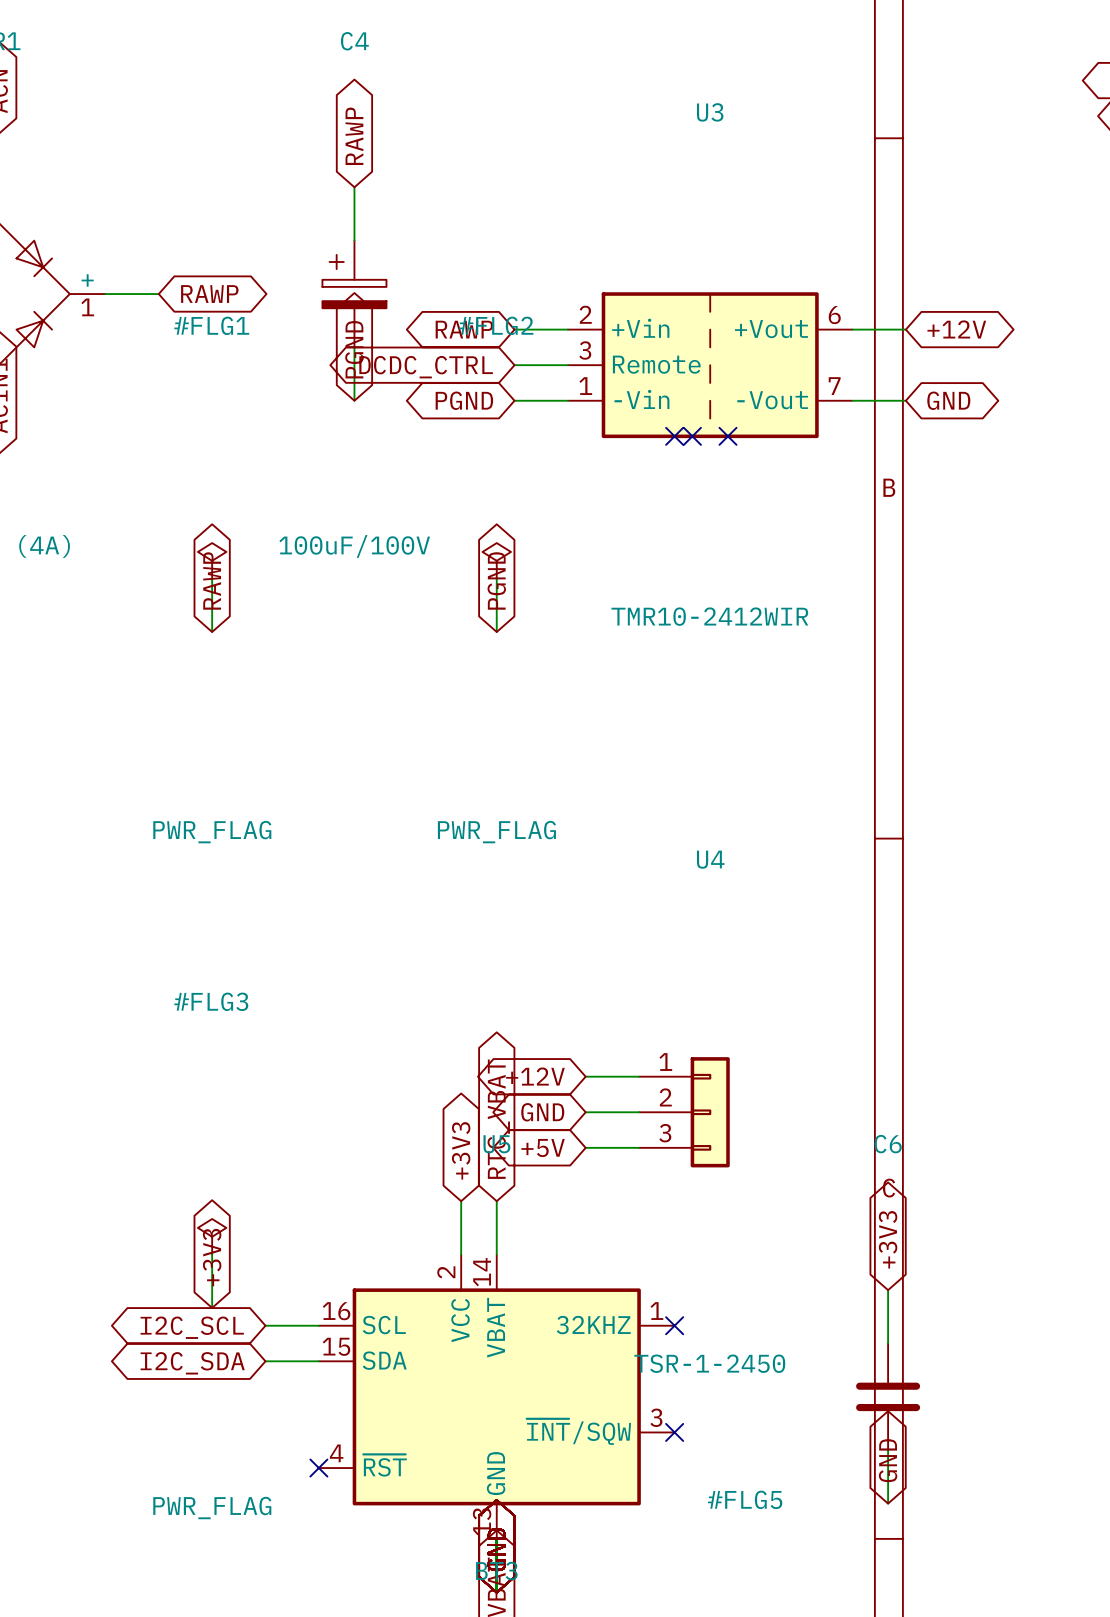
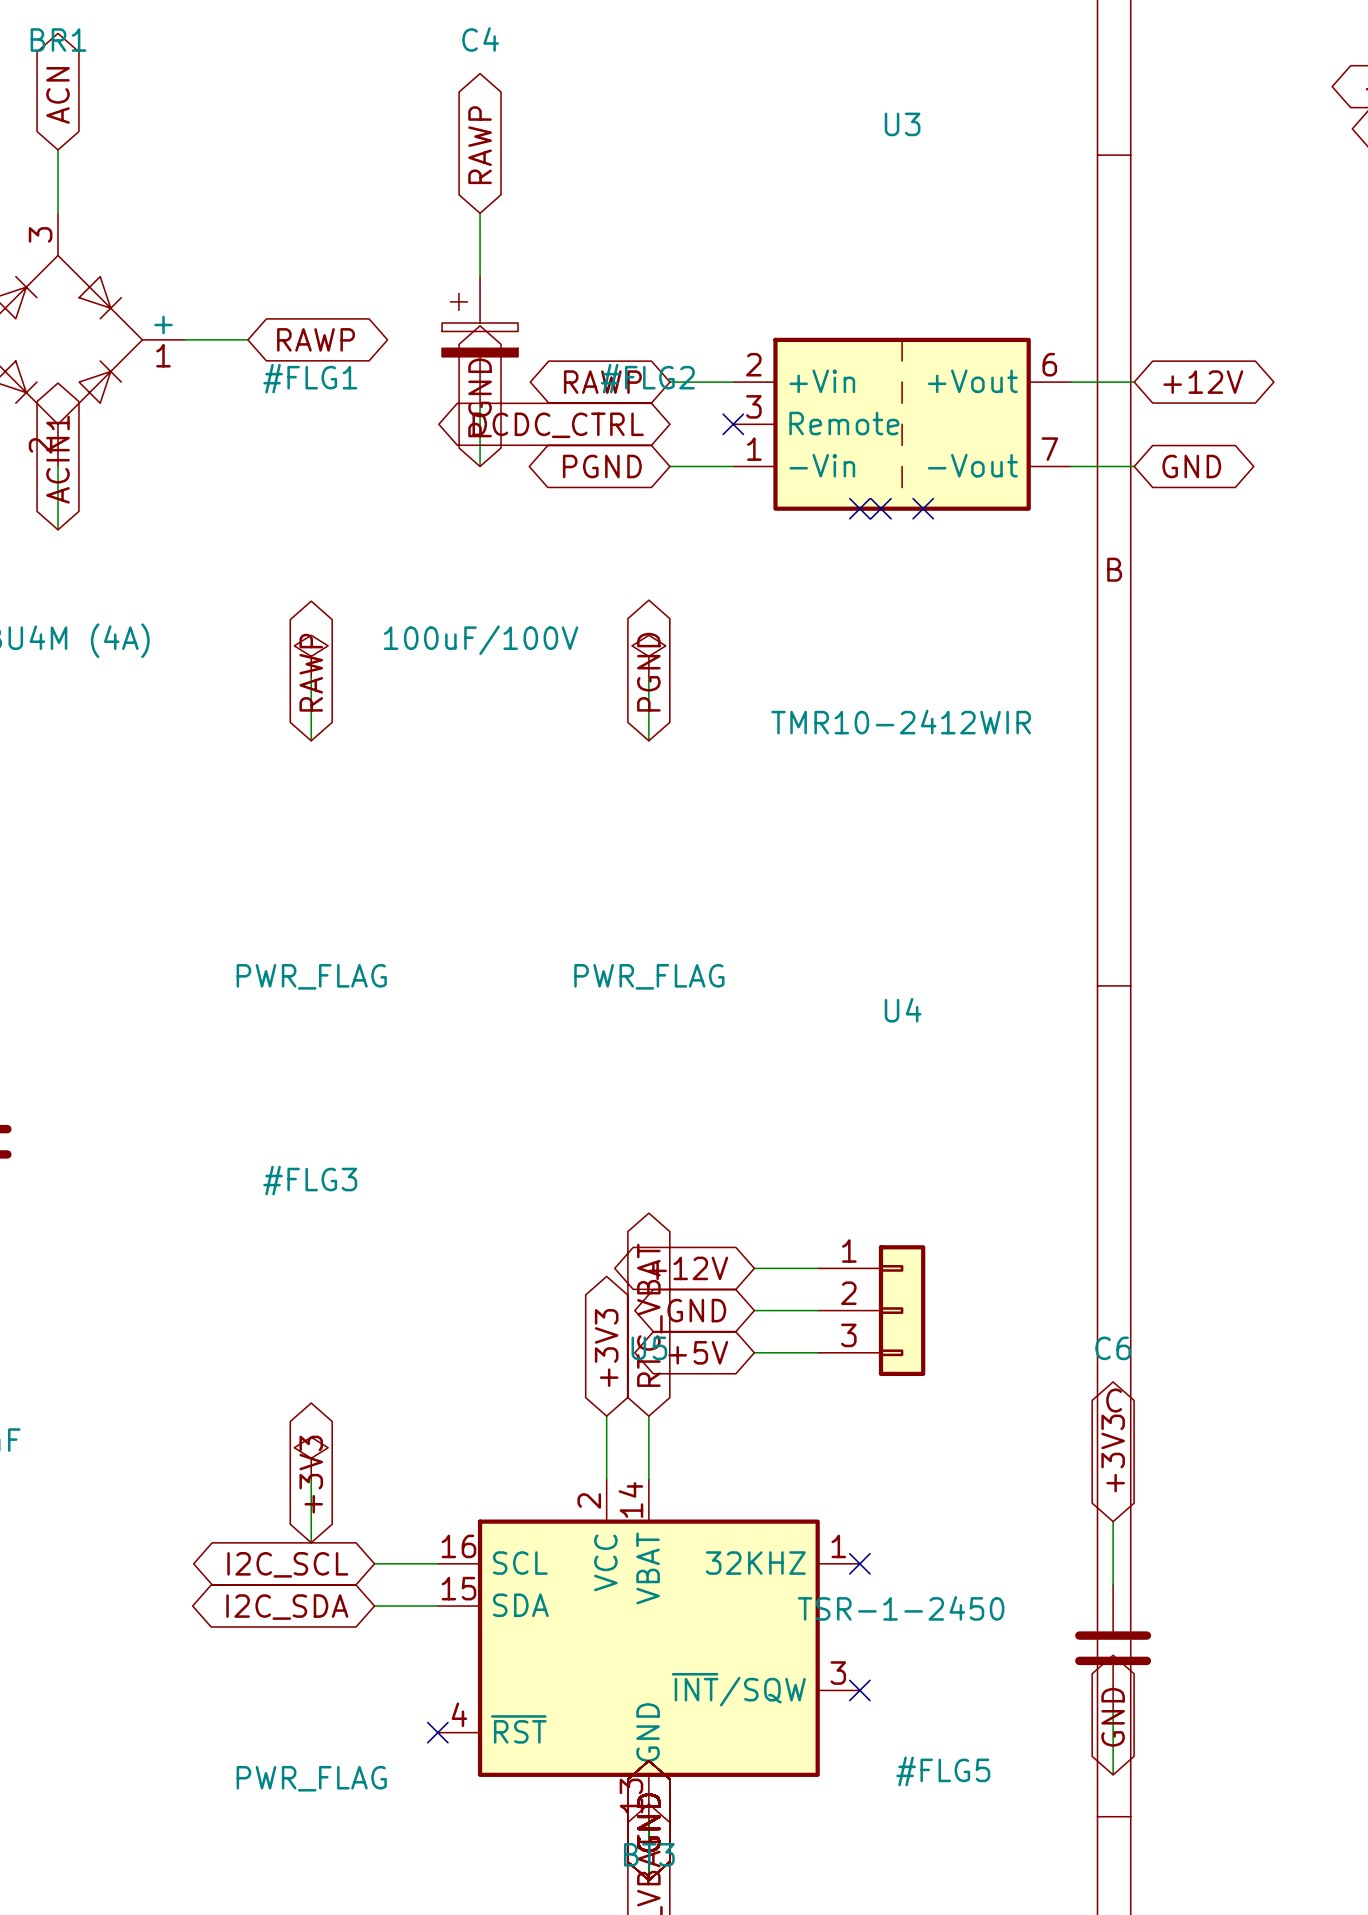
wire: (514, 365) (567, 365) -> none
no-connect mark: none -> (733, 424)

